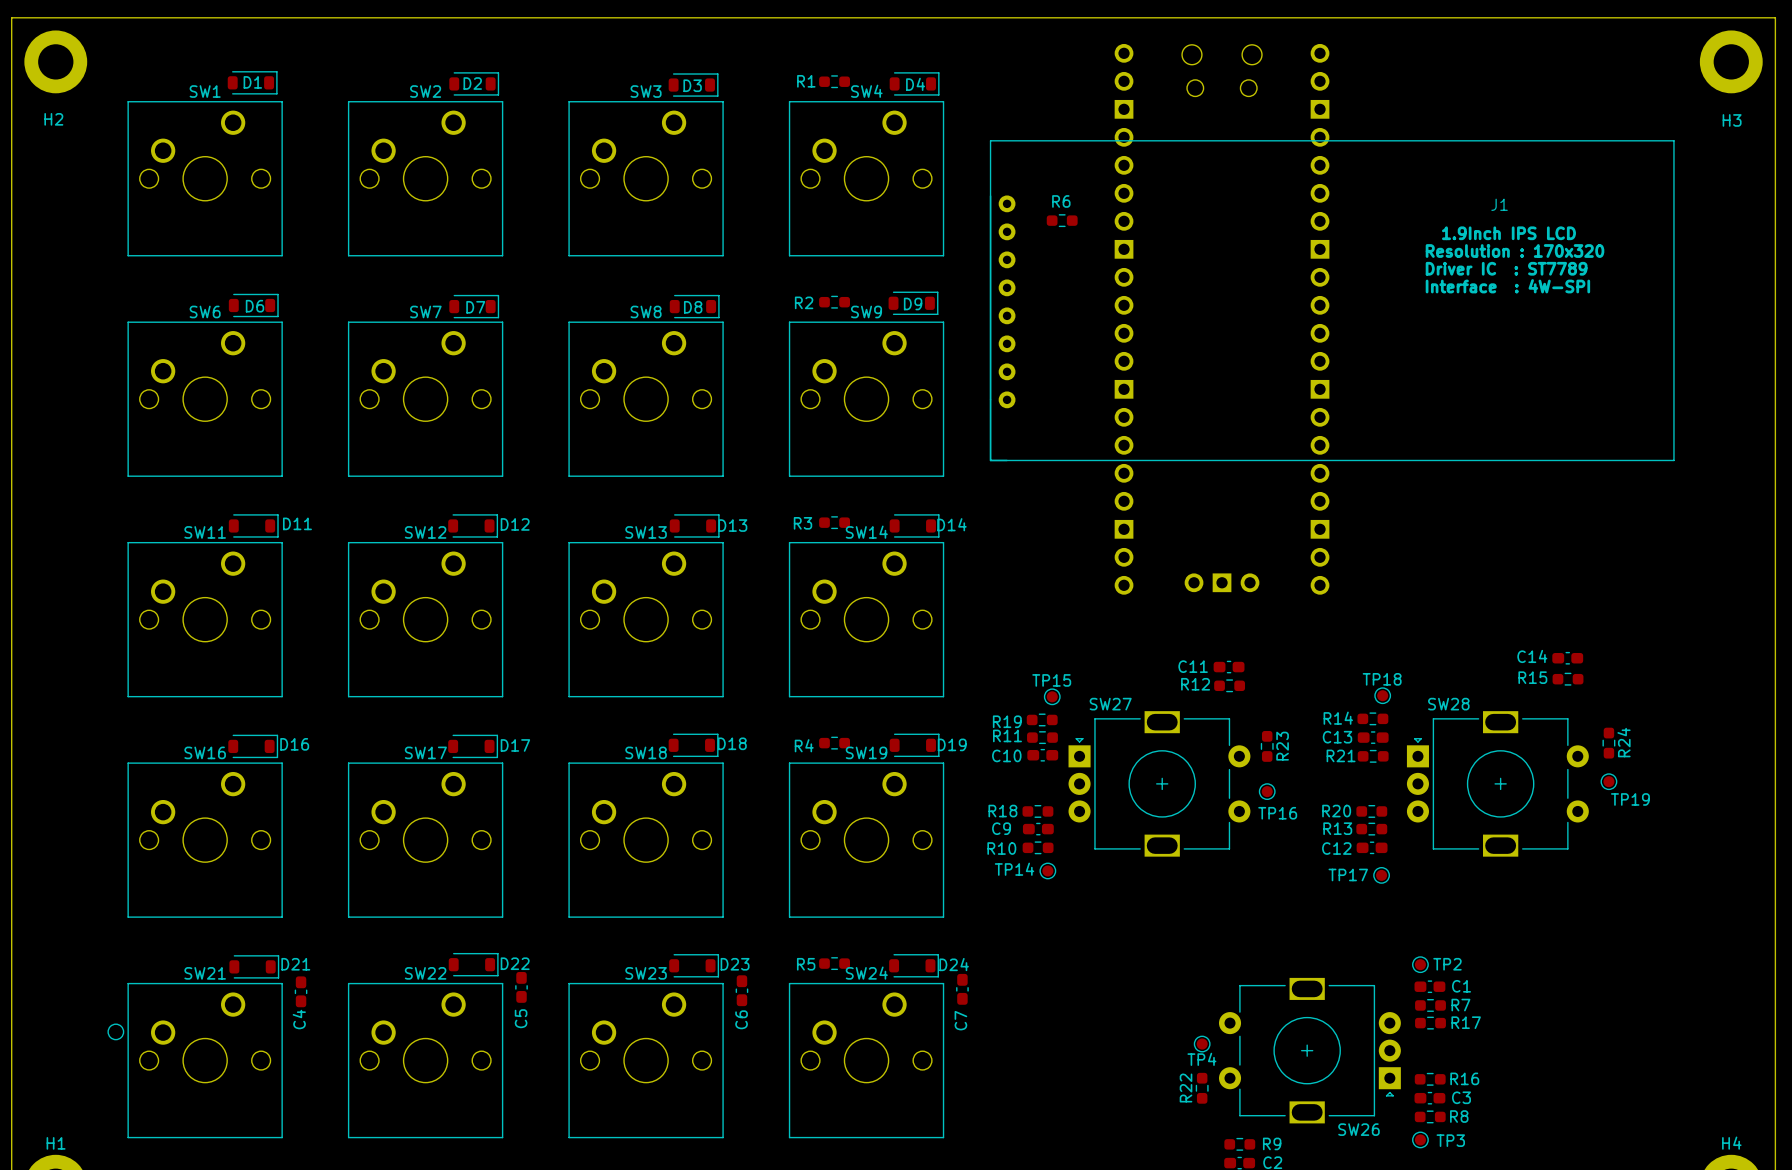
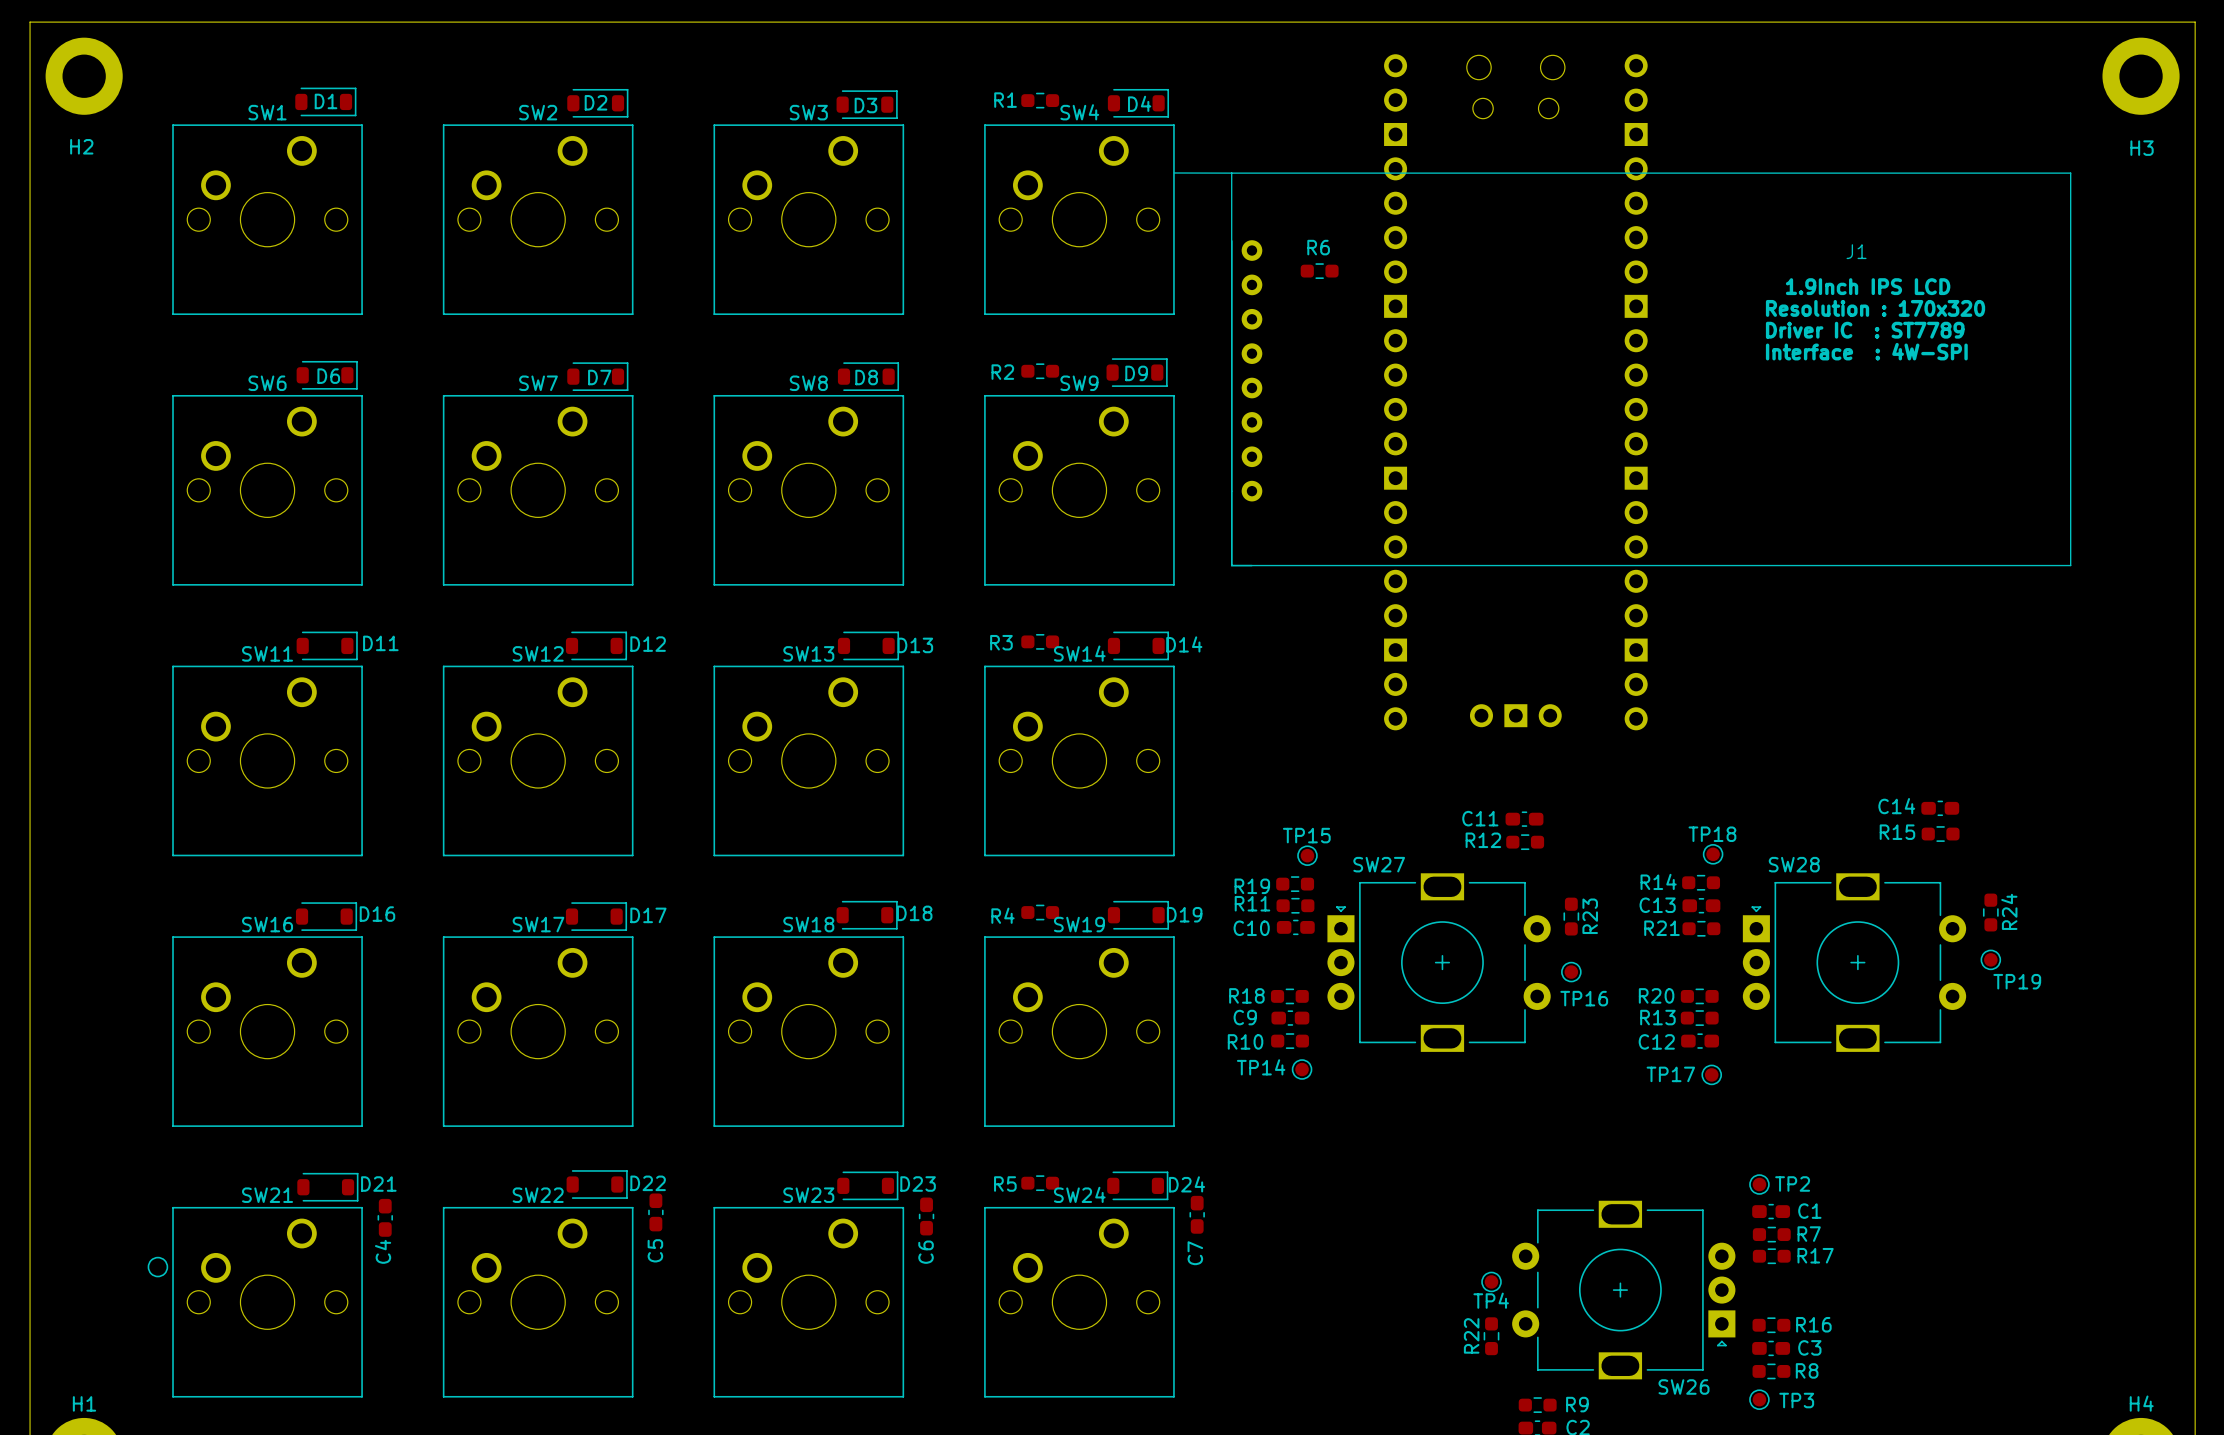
line: none -> (1174, 172) (1231, 173)

